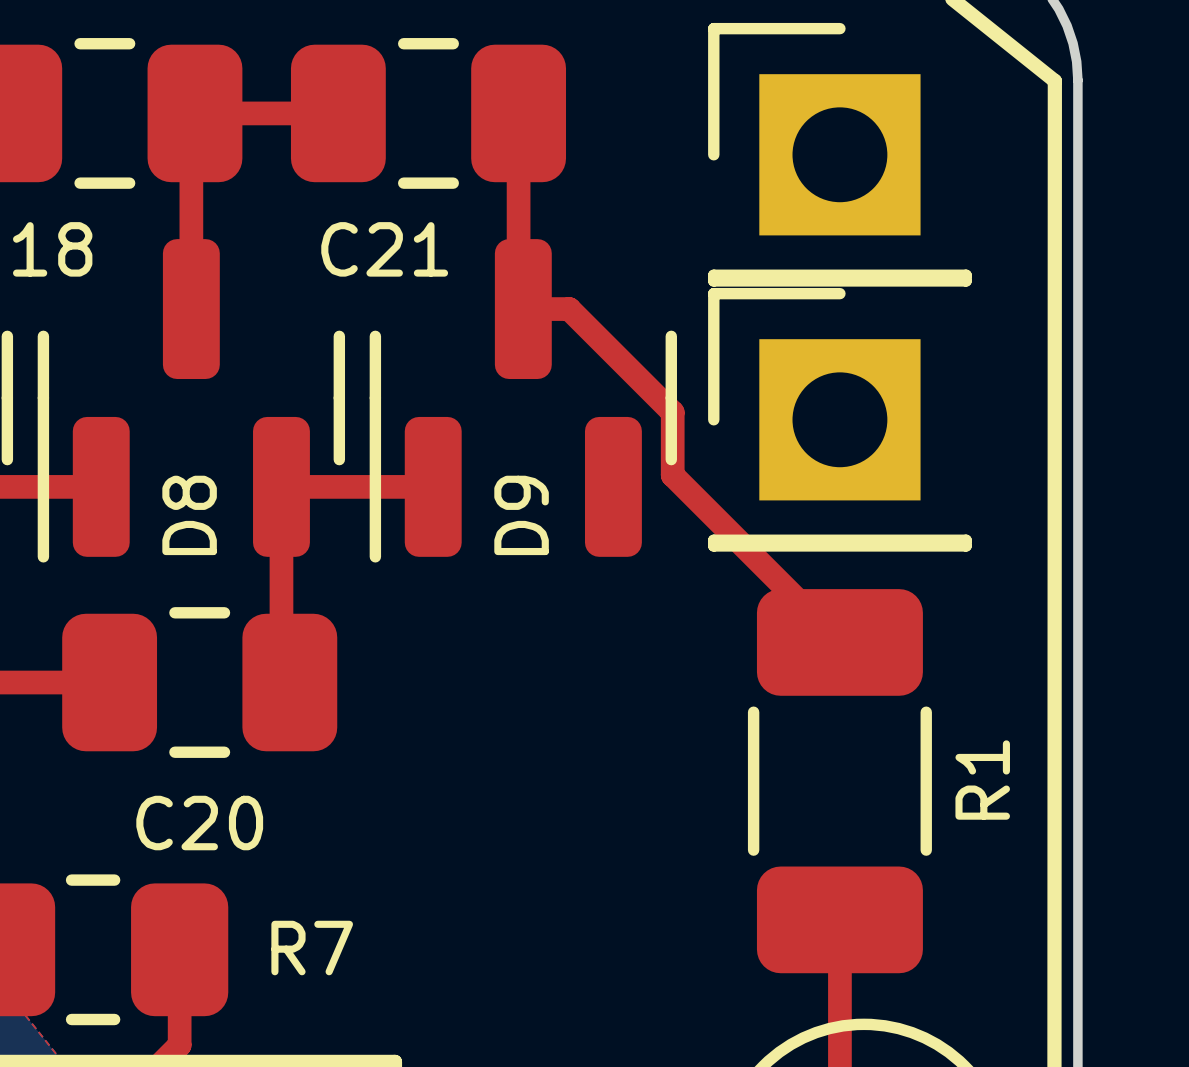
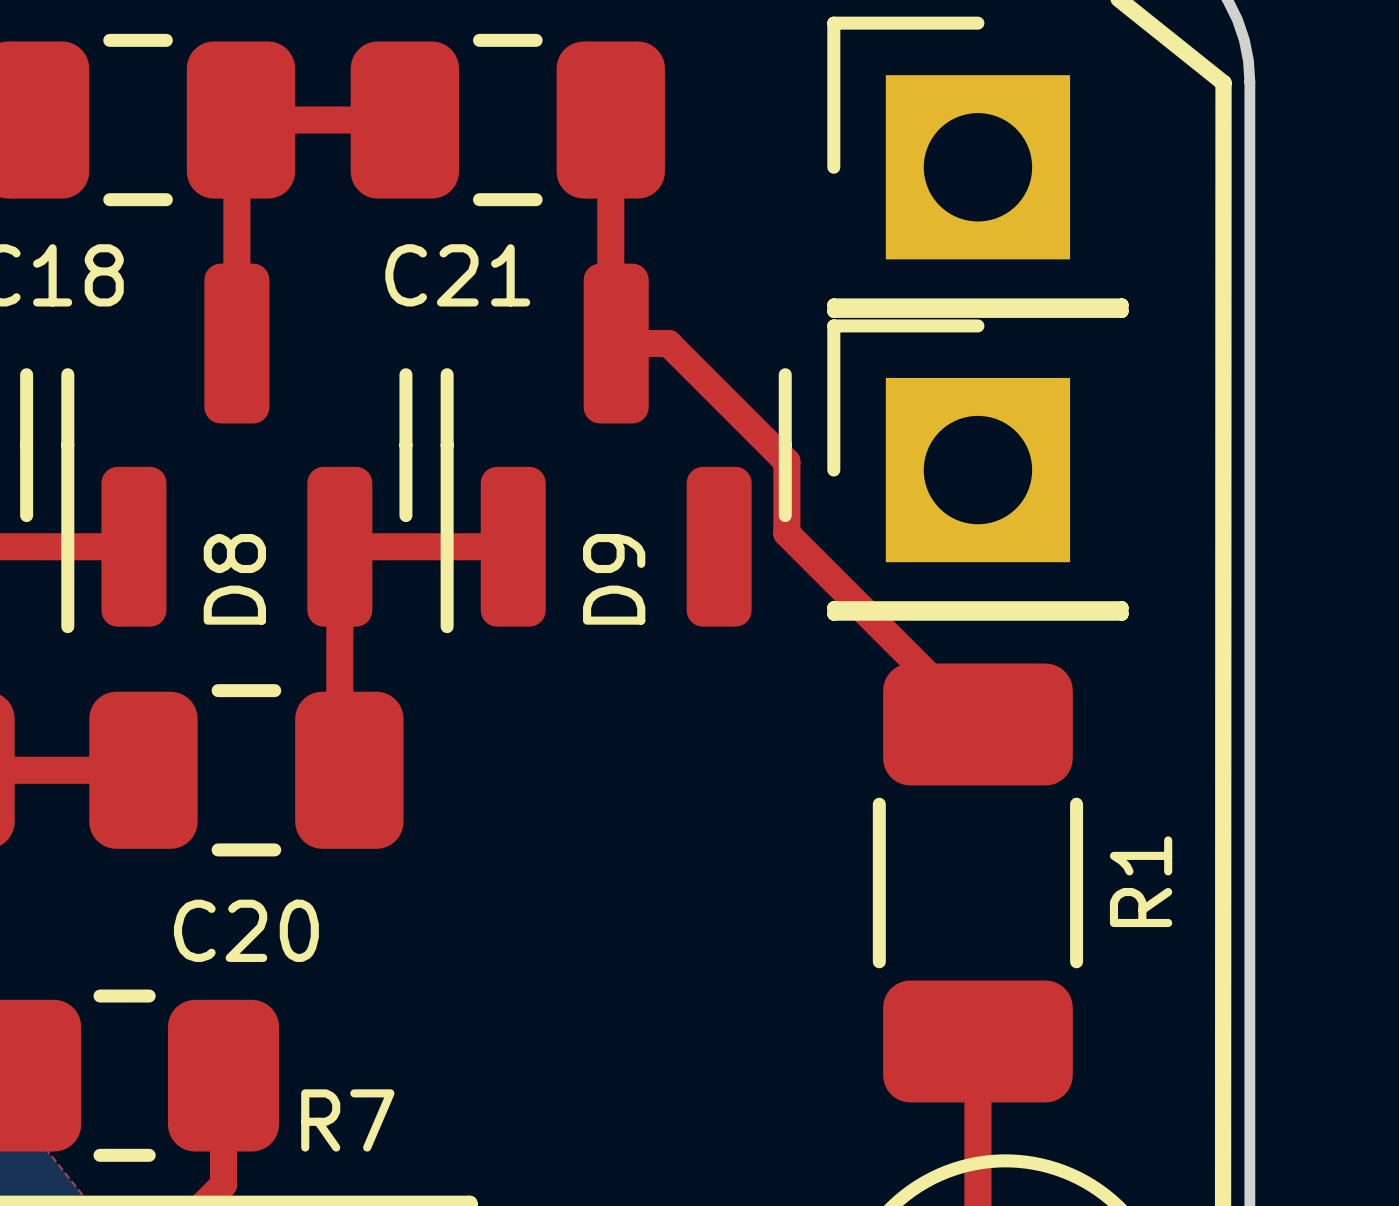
R7 name position: R7 (312, 948) -> R7 (347, 1120)

